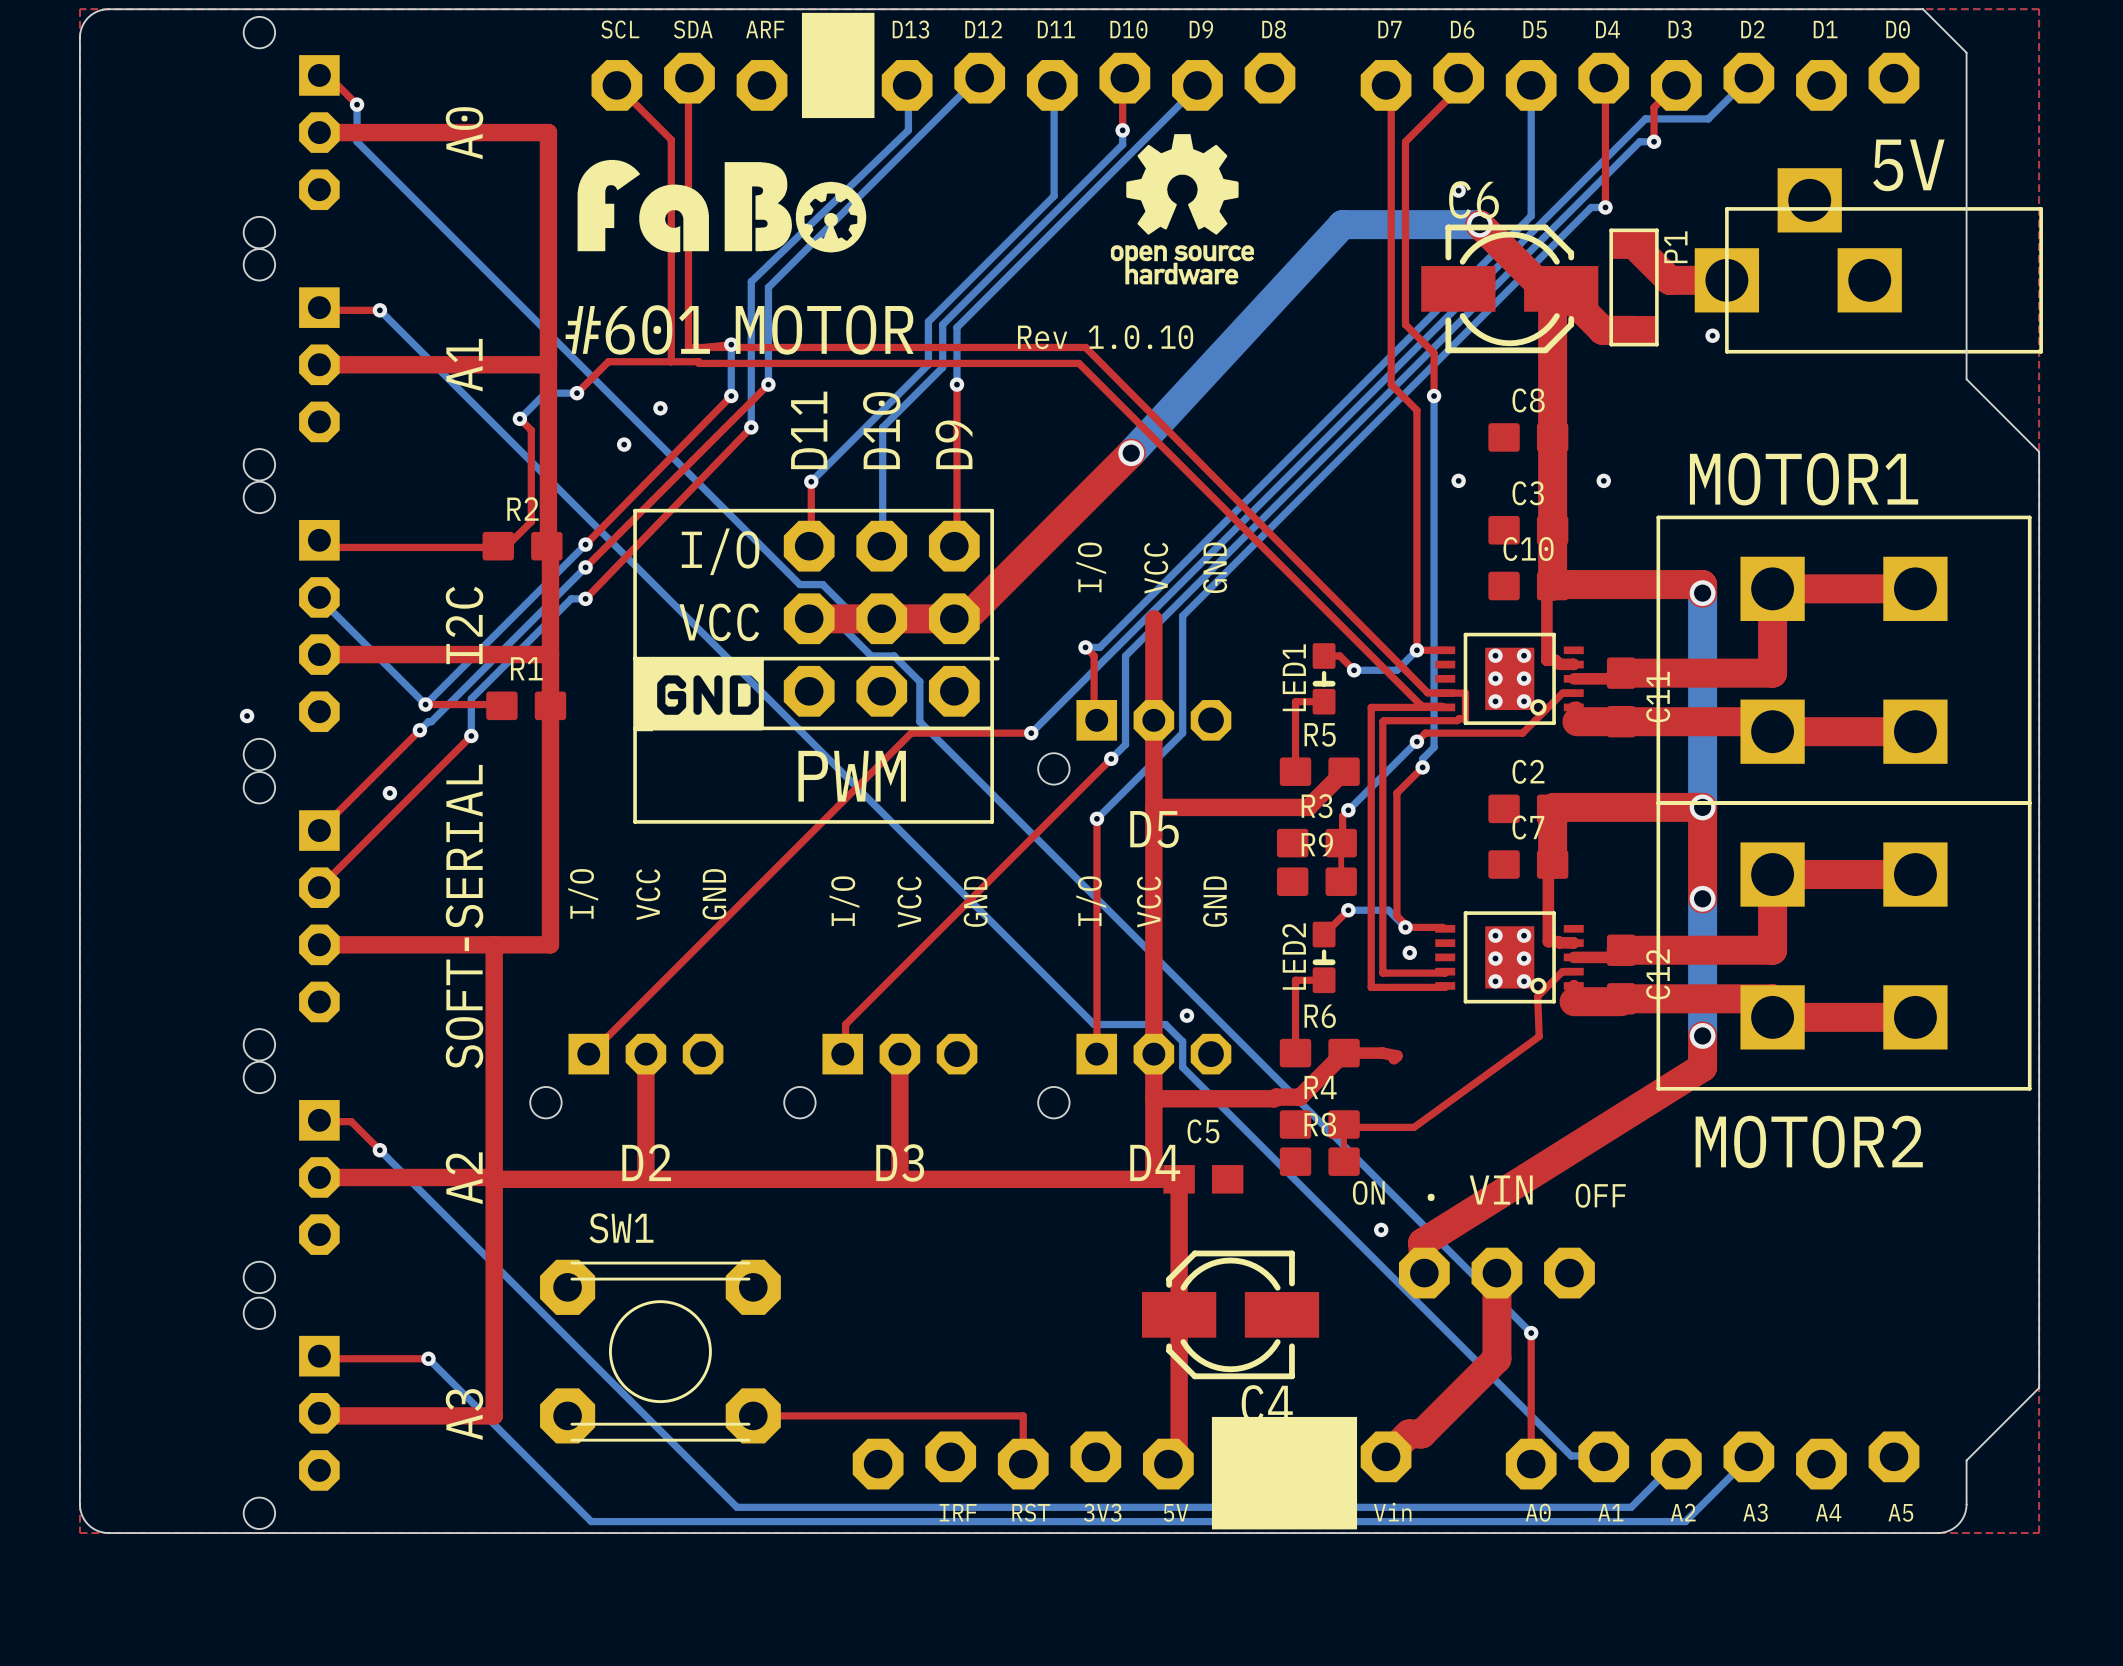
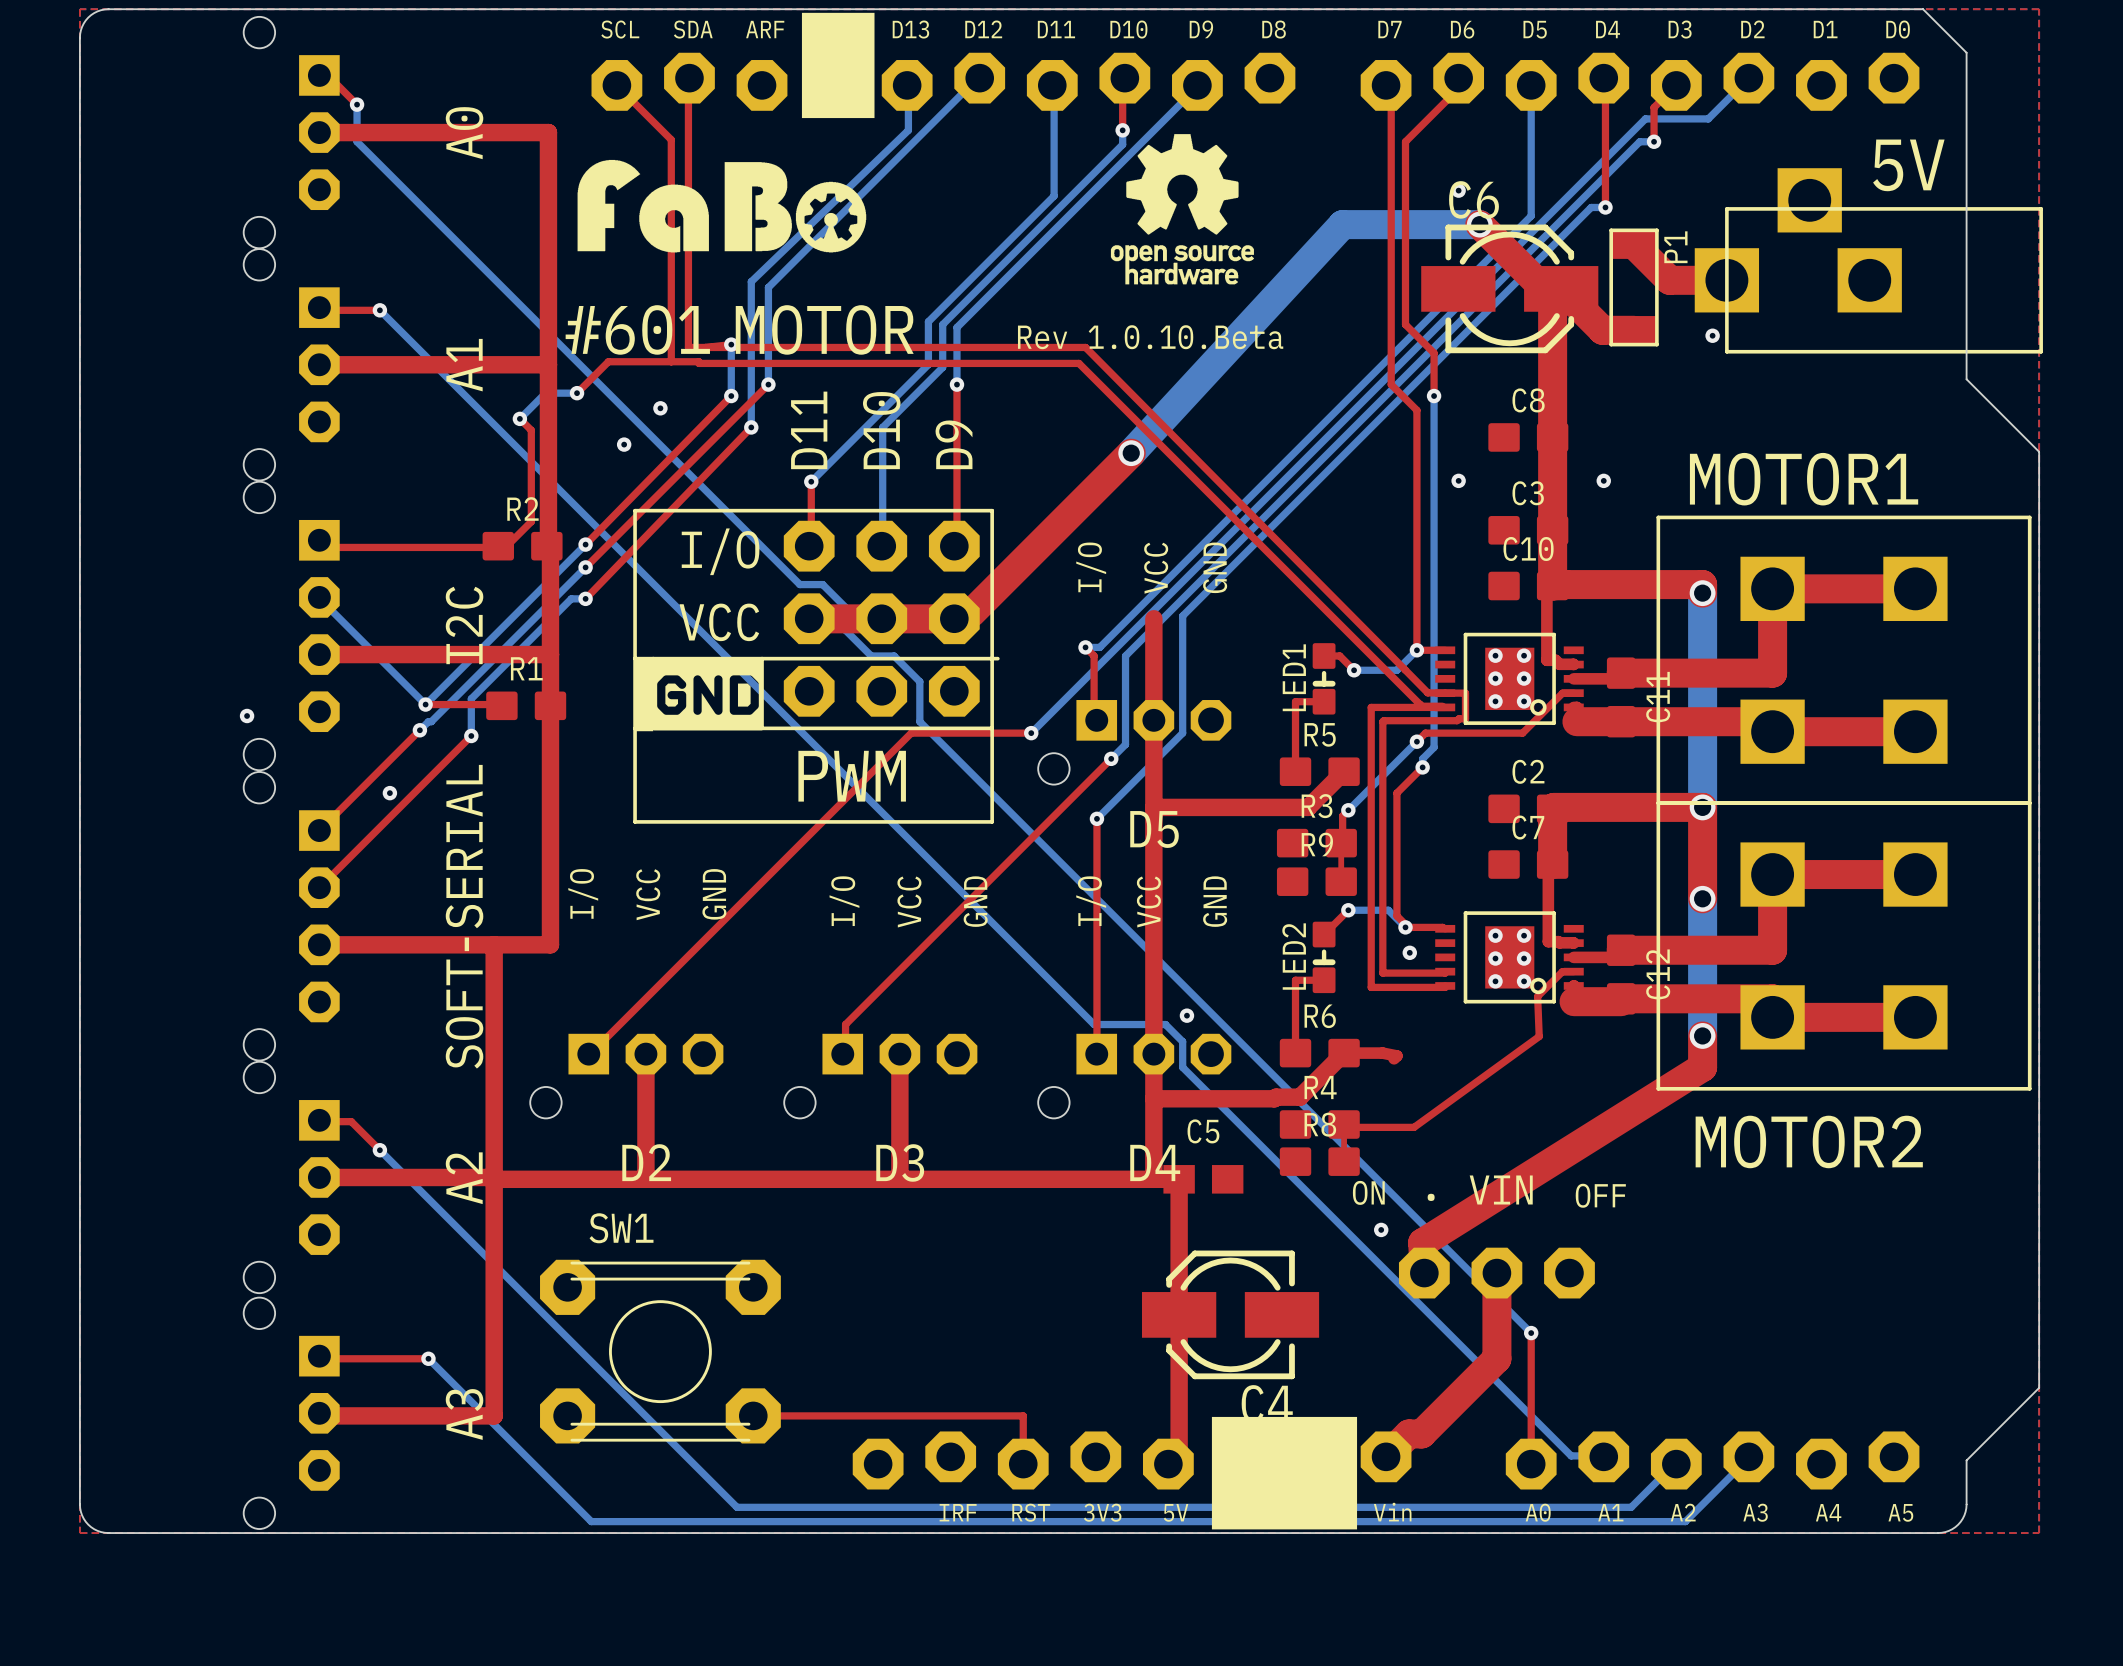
text: Rev 1.0.10 (1105, 337) -> Rev 1.0.10.Beta (1150, 337)

